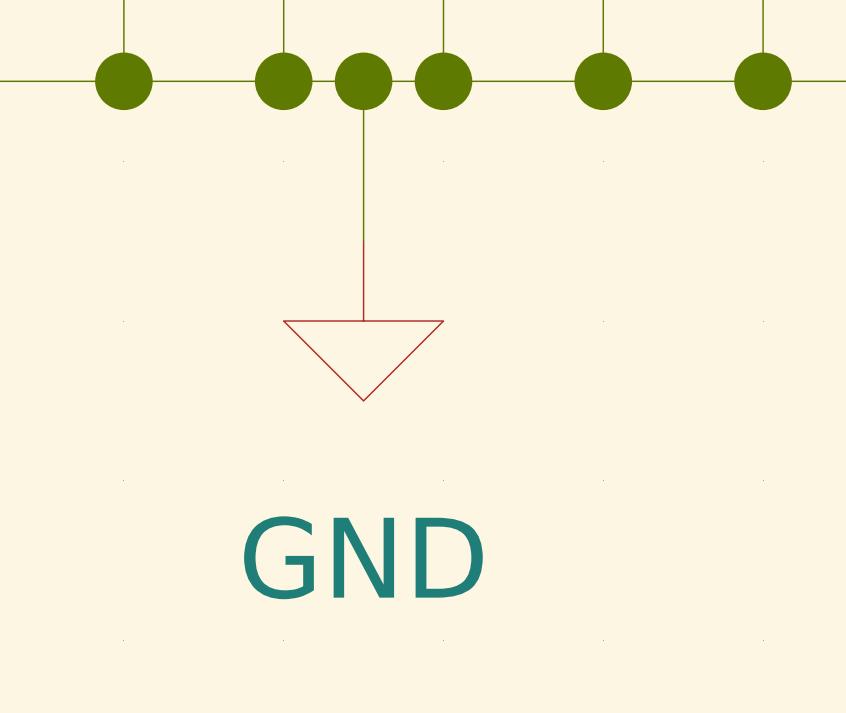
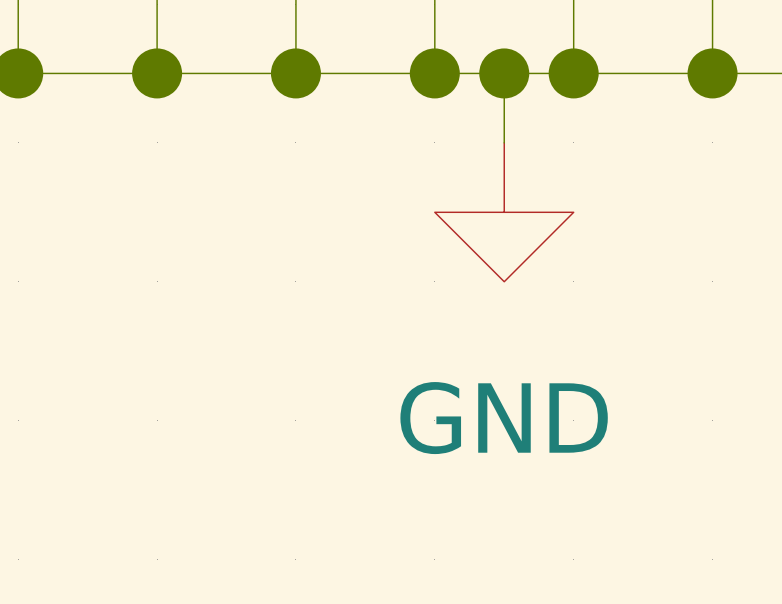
wire: (363, 81) (363, 241) -> none
junction position: (363, 81) -> (504, 73)
wire: none -> (504, 73) (504, 142)
power symbol position: GND (363, 321) -> GND (504, 212)

